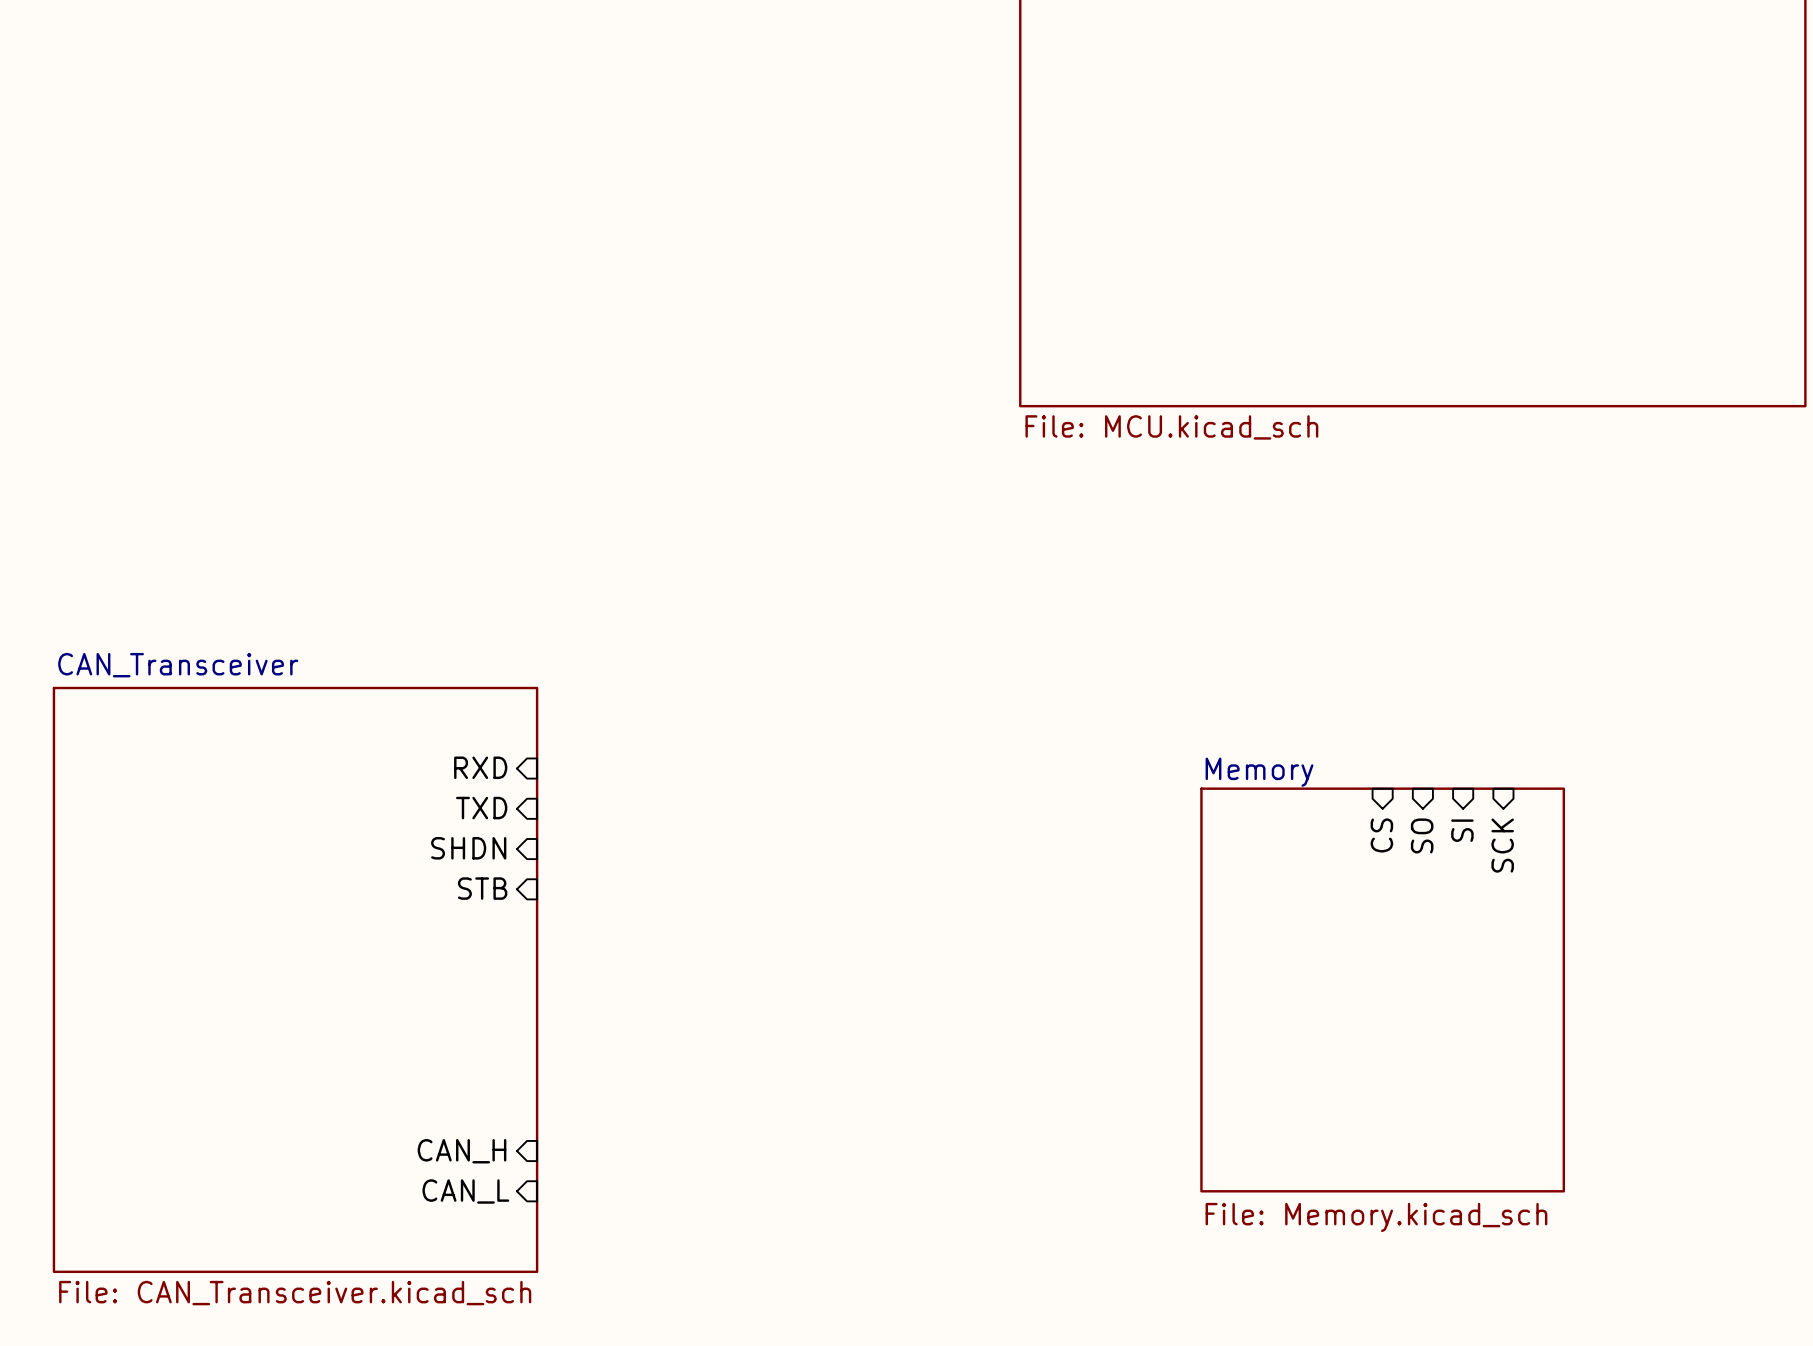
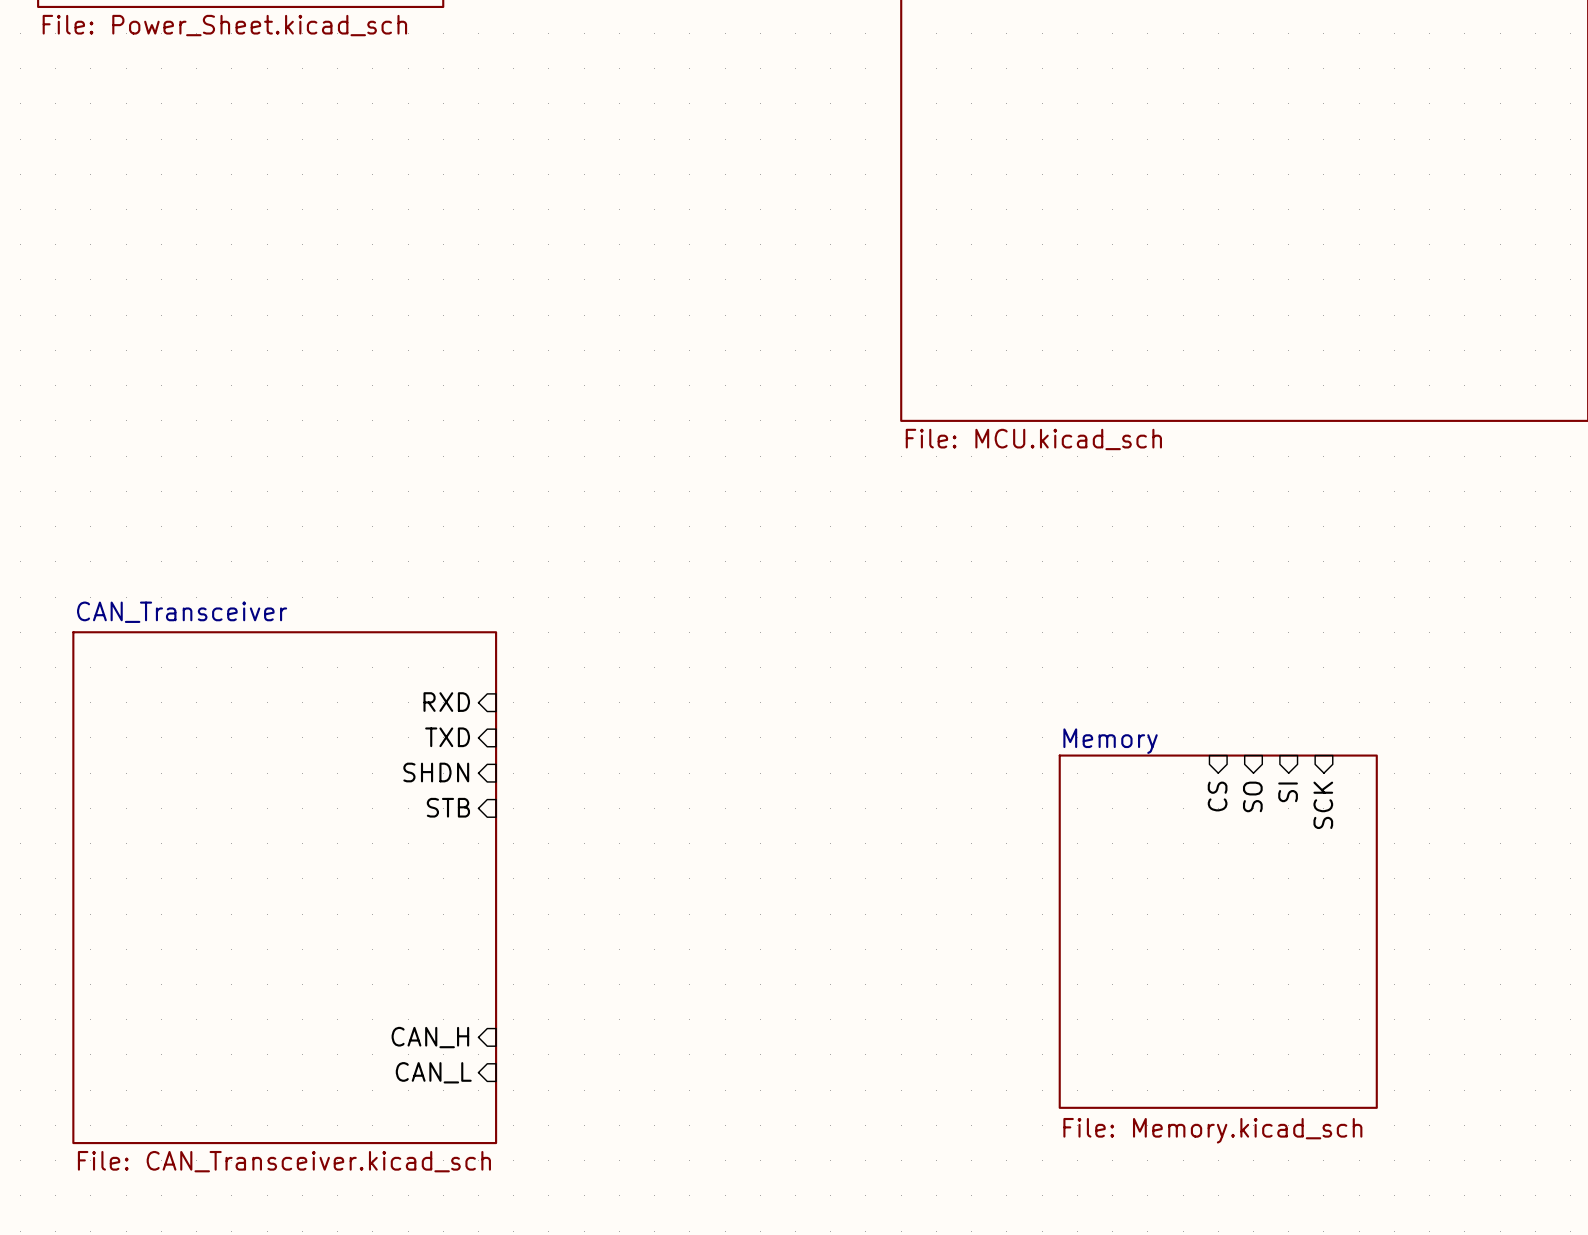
sheet pin position: RXD (480, 767) -> RXD (446, 702)
sheet pin position: TXD (481, 808) -> TXD (447, 737)
sheet pin position: SHDN (468, 848) -> SHDN (436, 772)
sheet pin position: STB (482, 888) -> STB (448, 807)
sheet CAN_Transceiver position: (295, 979) -> (284, 887)
sheet pin position: CAN_H (462, 1151) -> CAN_H (430, 1037)
sheet pin position: CAN_L (465, 1191) -> CAN_L (433, 1072)

